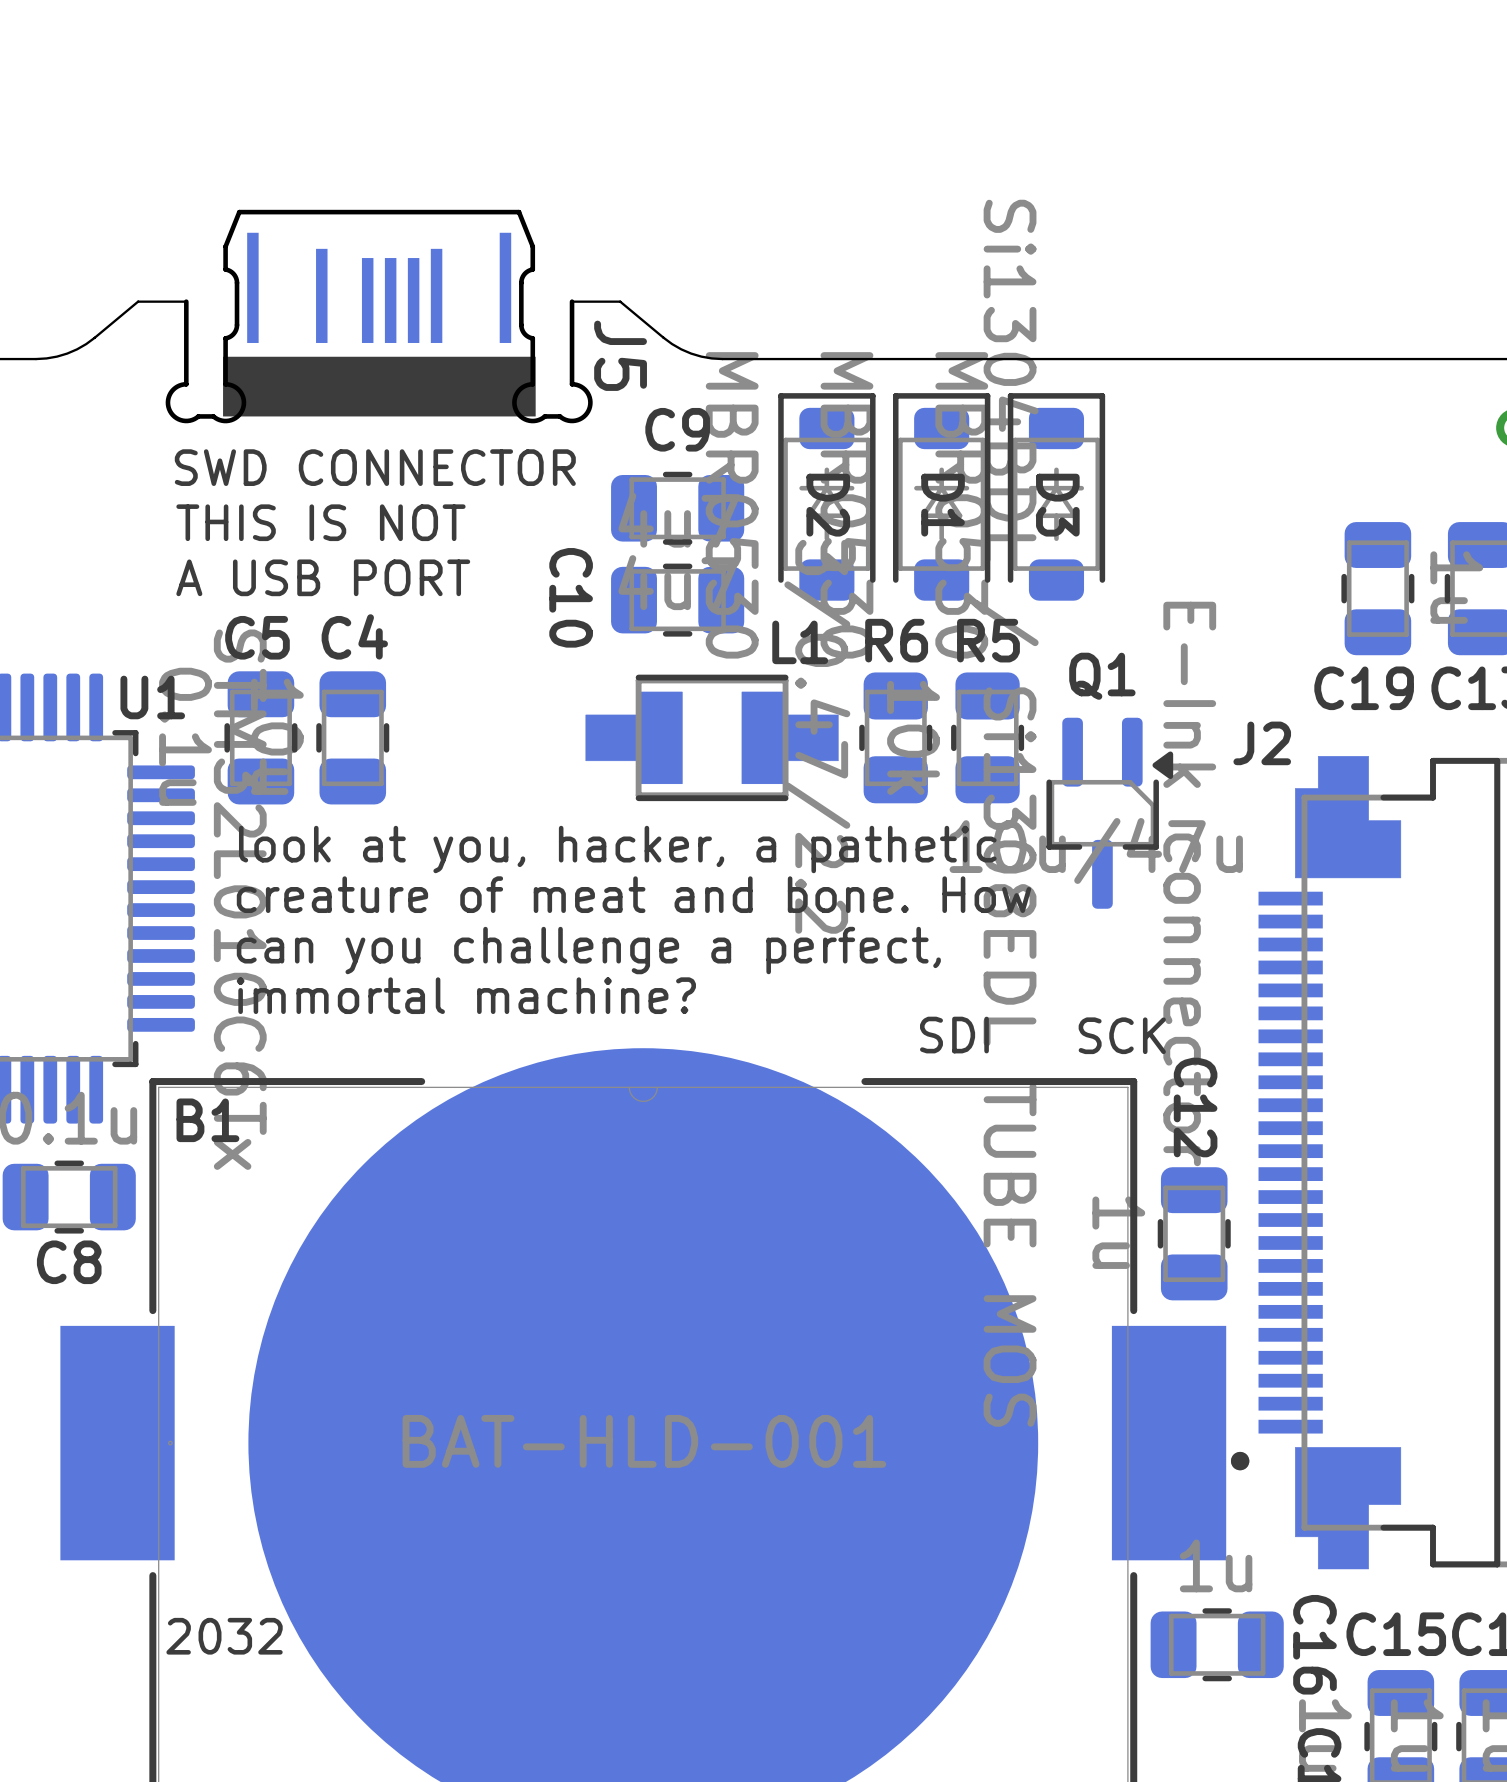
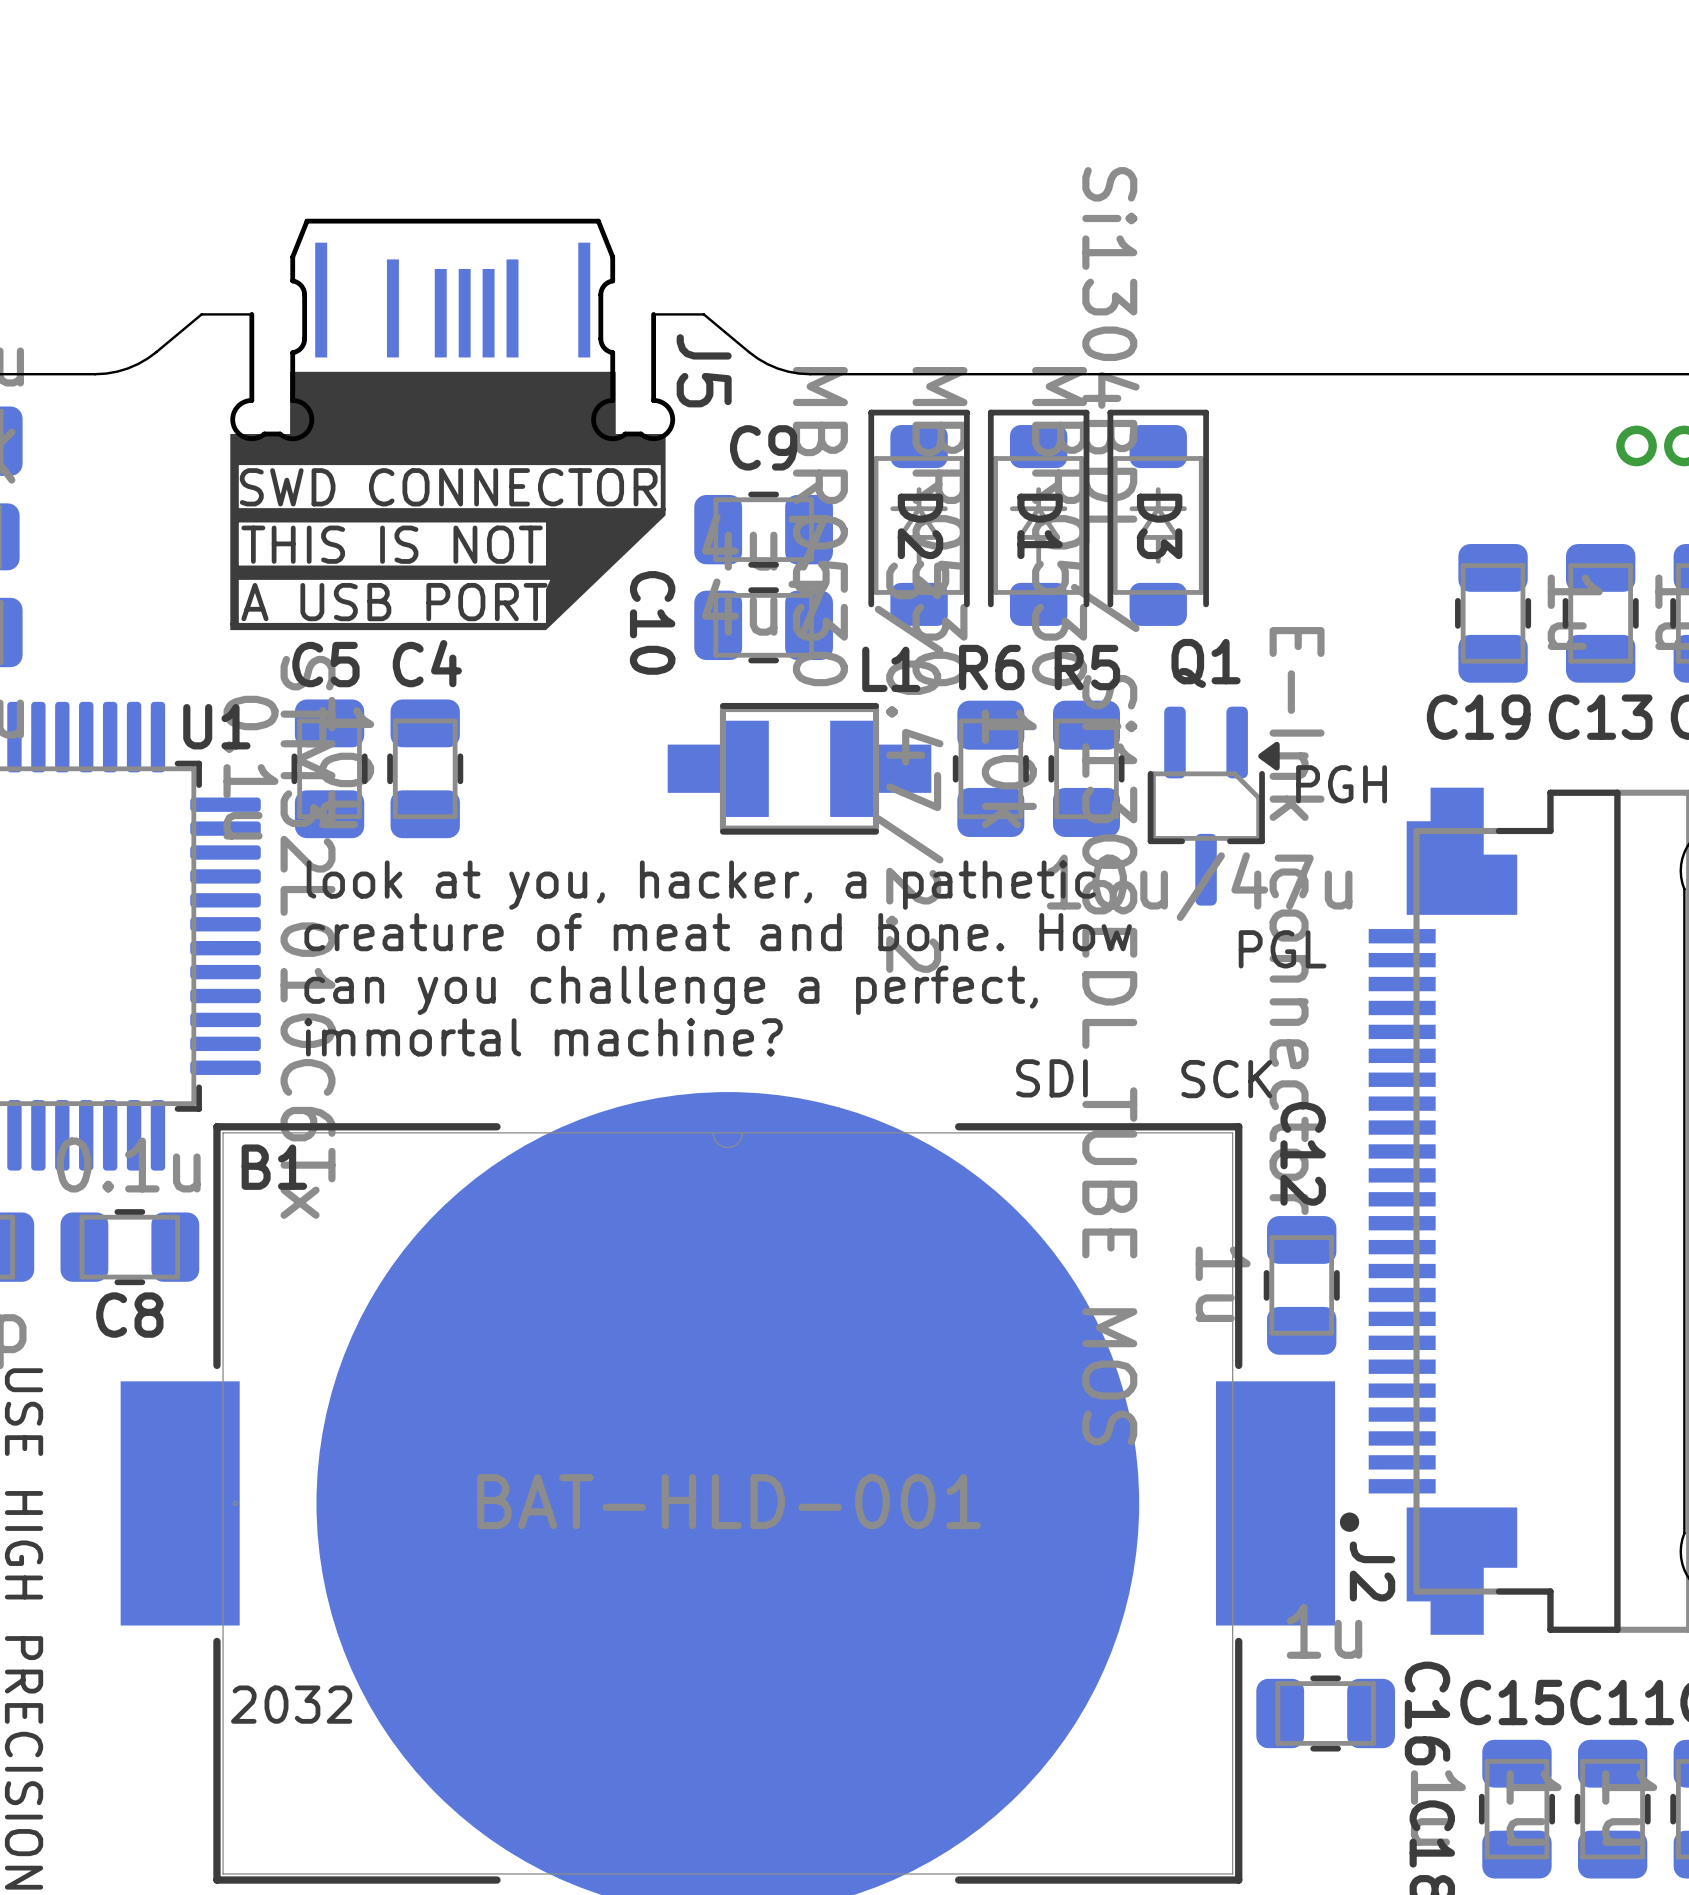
drawing: none -> [230, 433, 666, 631]
J2 name rotation: 0° (1262, 743) -> 90° clockwise (1372, 1571)
J2 name position: J2 (1262, 743) -> J2 (1372, 1571)
text: none -> PGH (1341, 784)
Q1 position: (1109, 813) -> (1213, 806)
text: none -> PGL (1282, 949)

